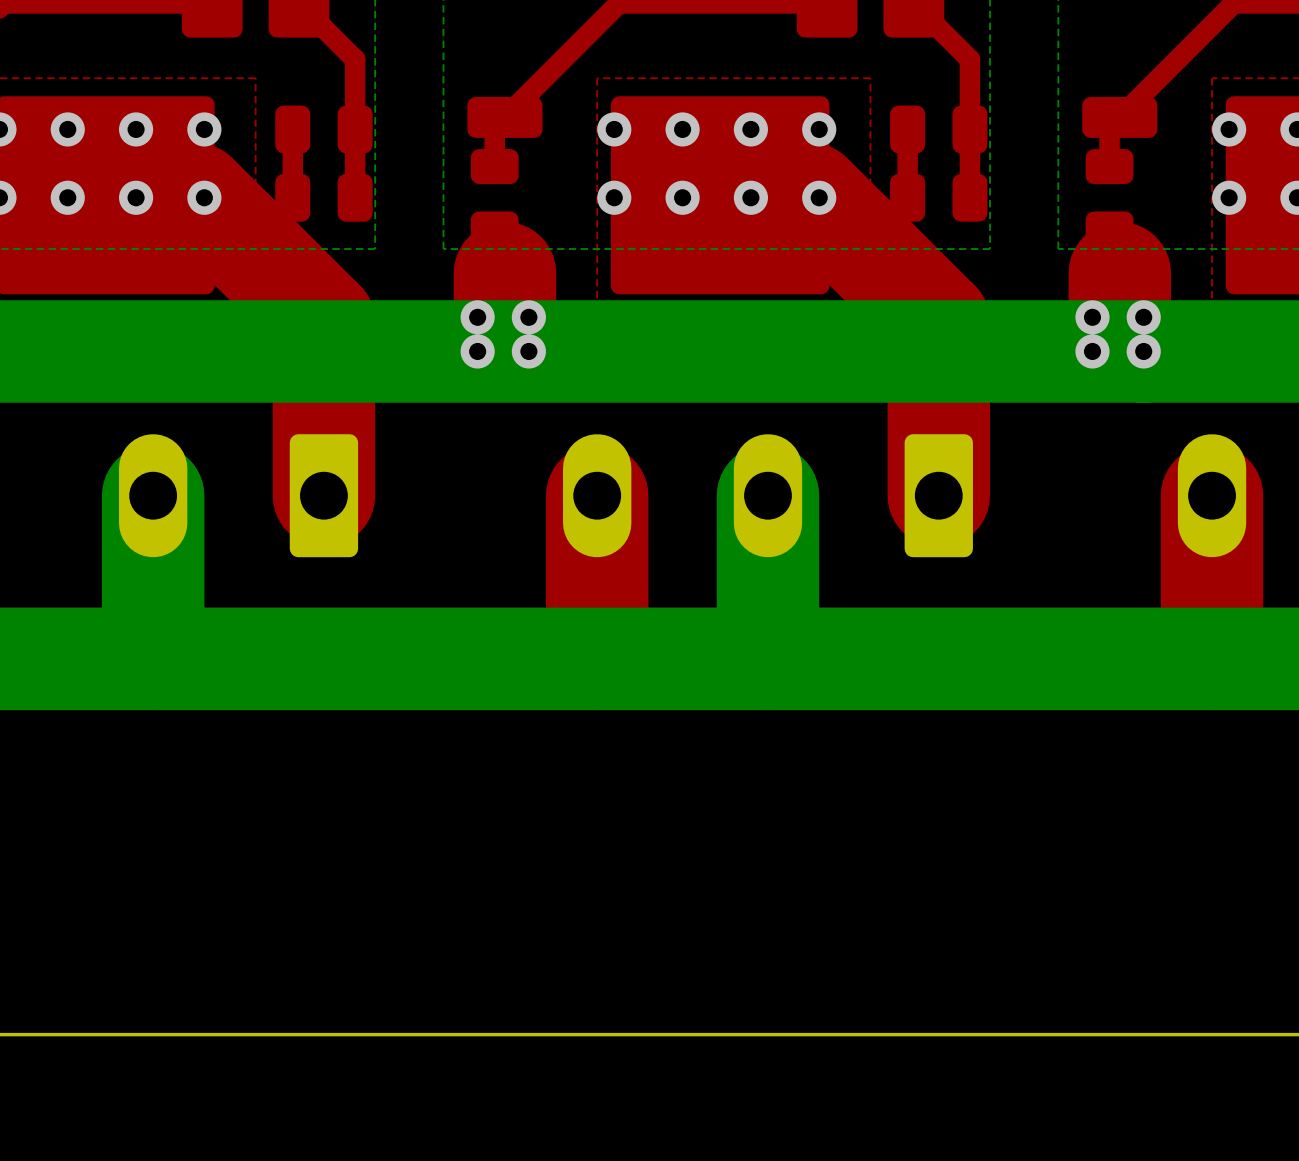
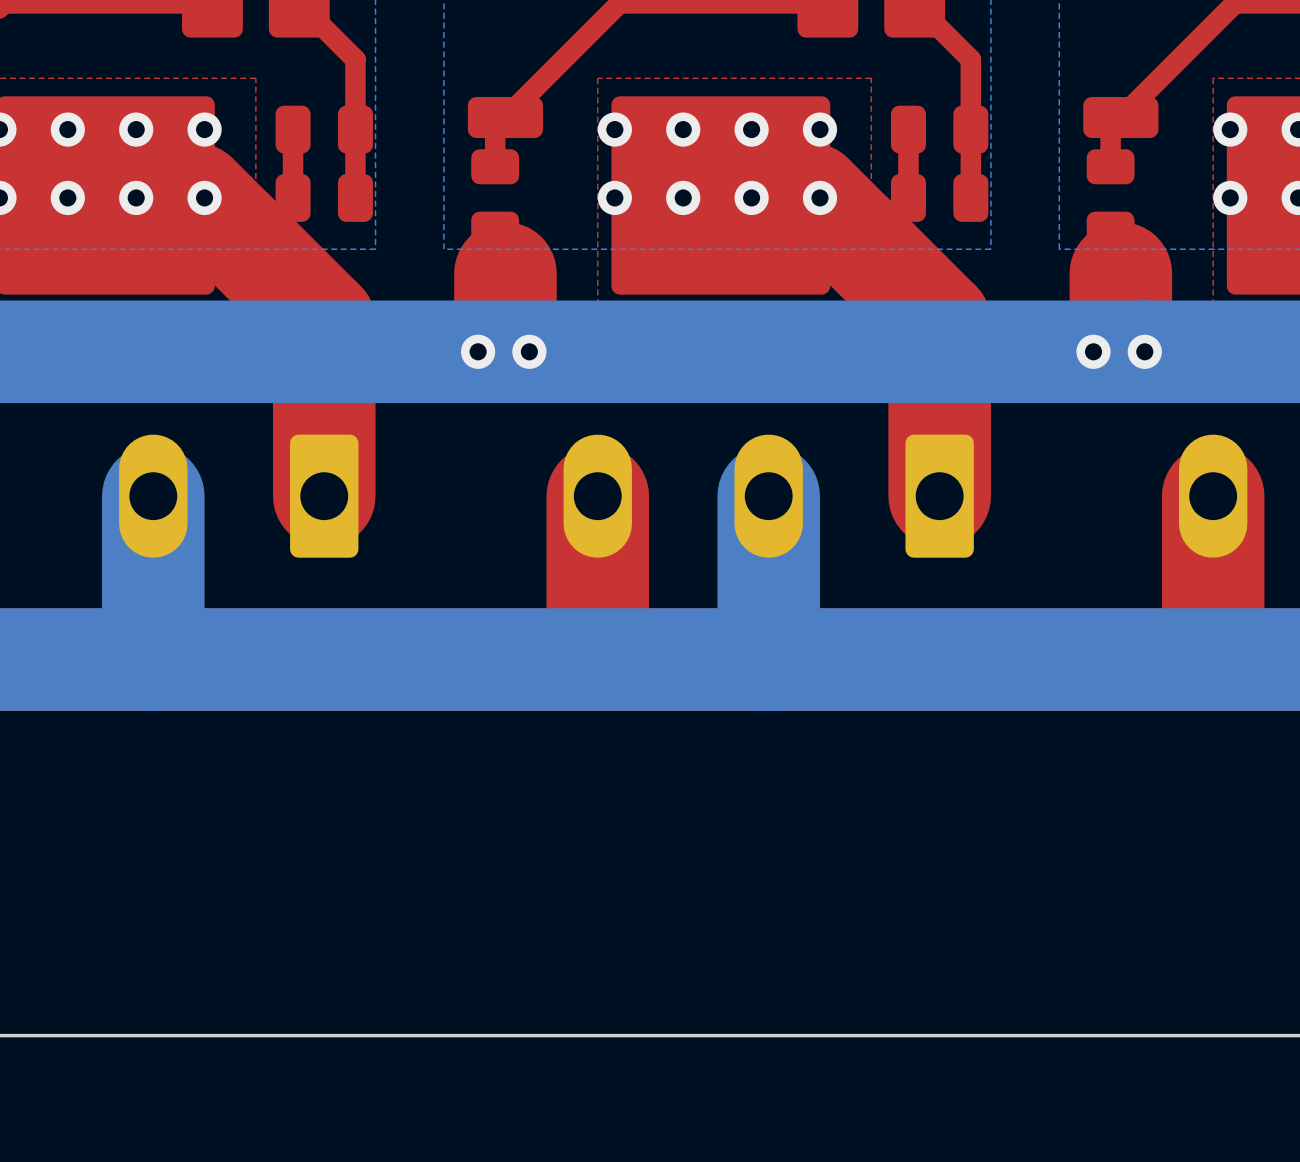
via: (477, 317) -> none
via: (528, 317) -> none
via: (1092, 317) -> none
via: (1143, 317) -> none

